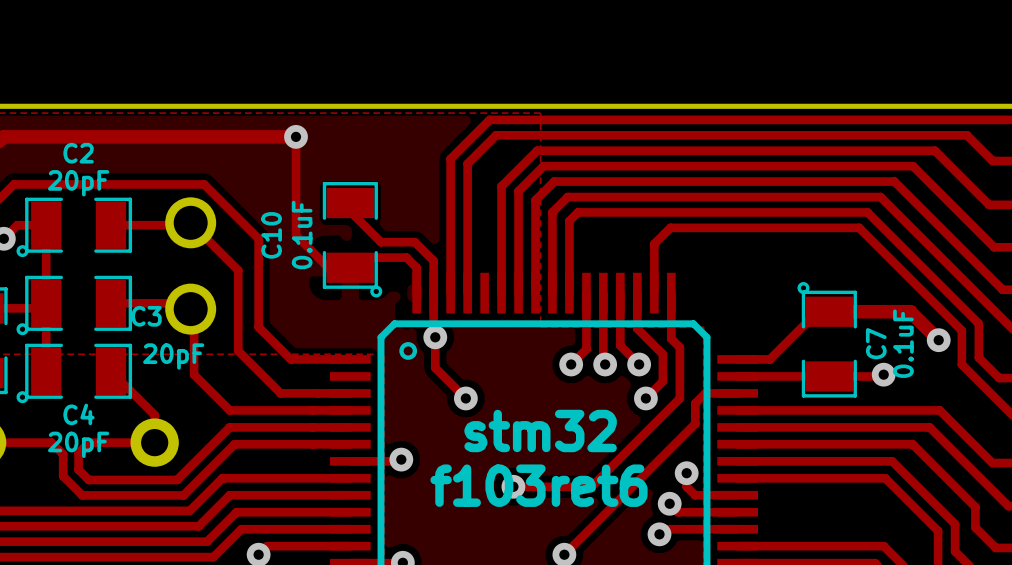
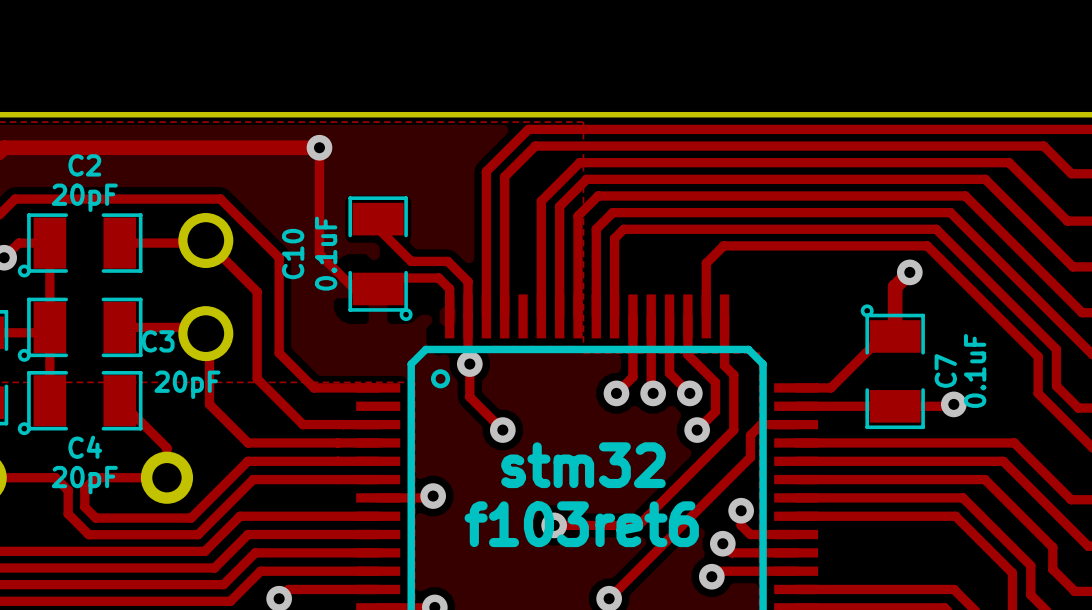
track: (829, 311) (910, 311) (938, 340) -> (895, 336) (895, 287) (909, 272)
via position: (938, 340) -> (909, 272)

